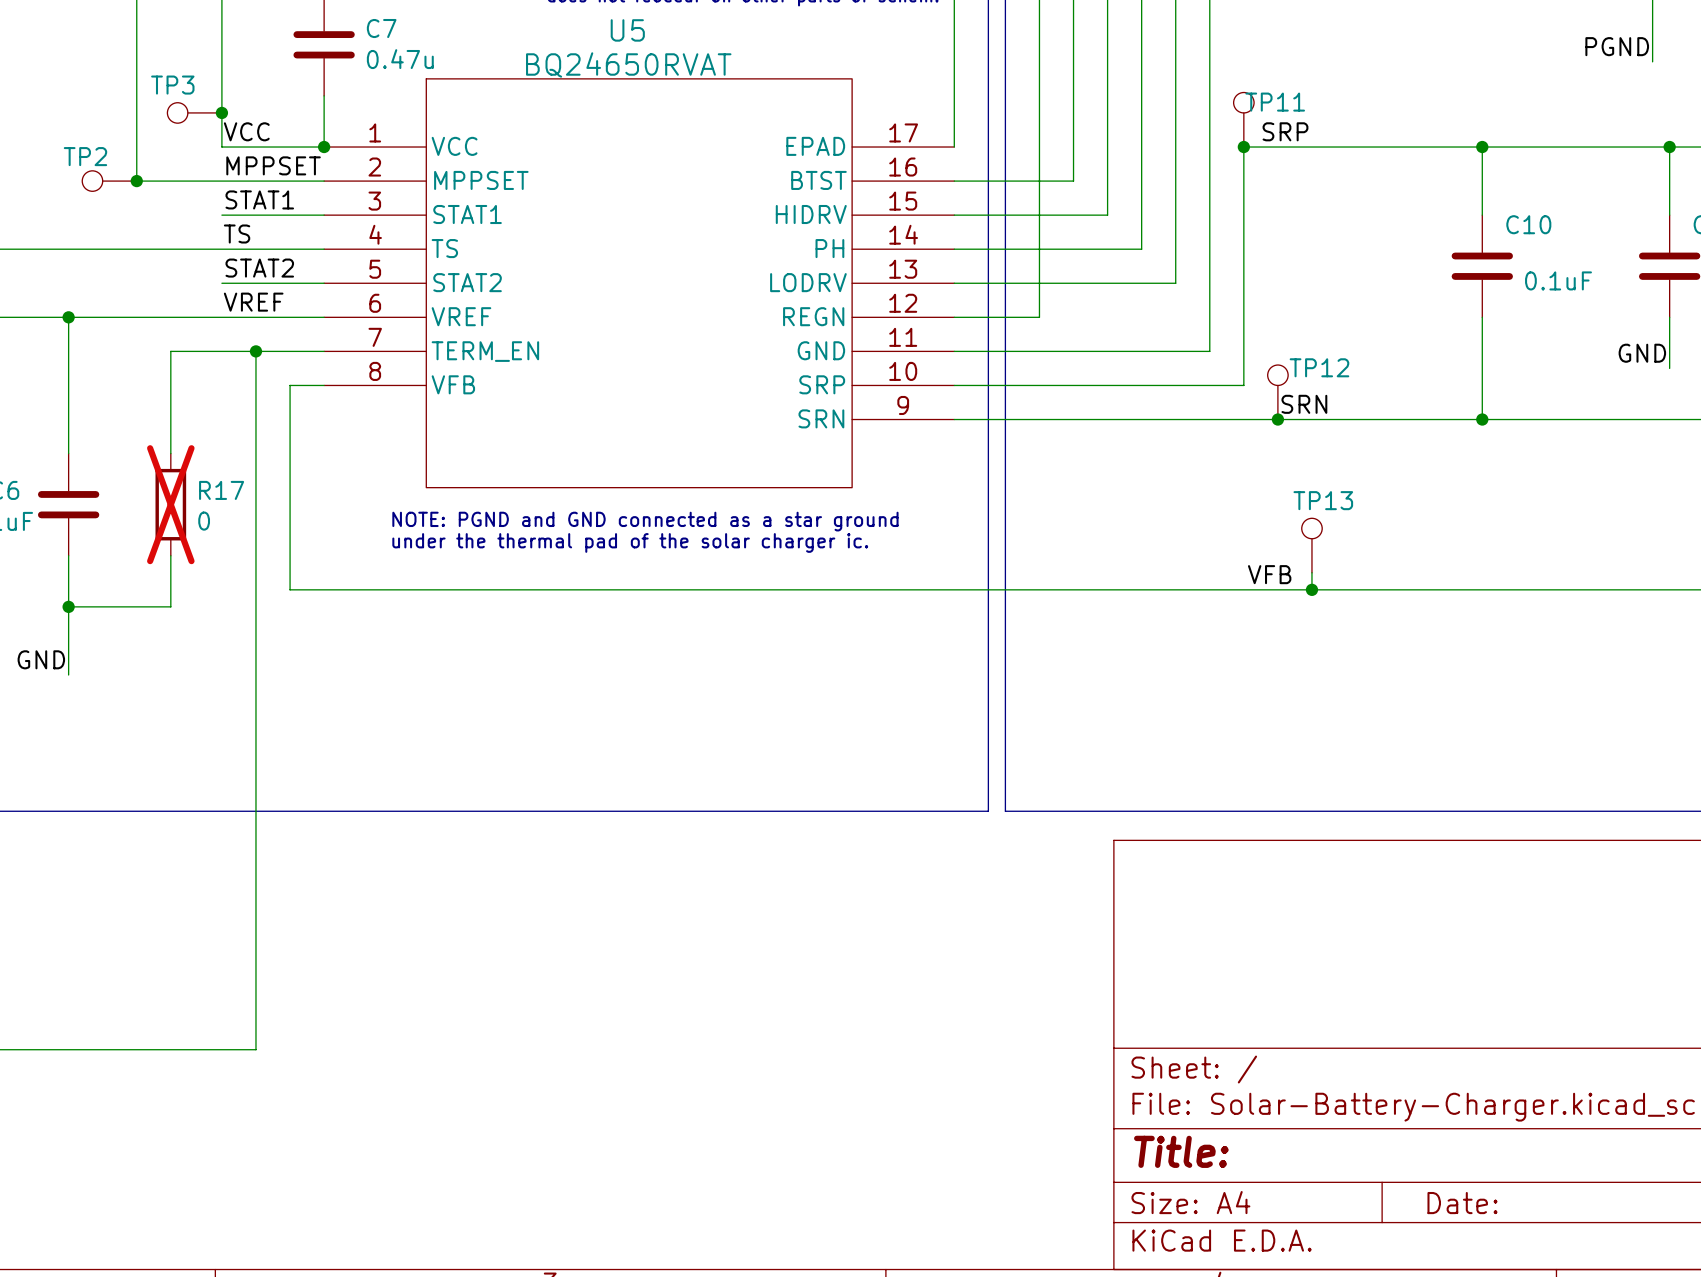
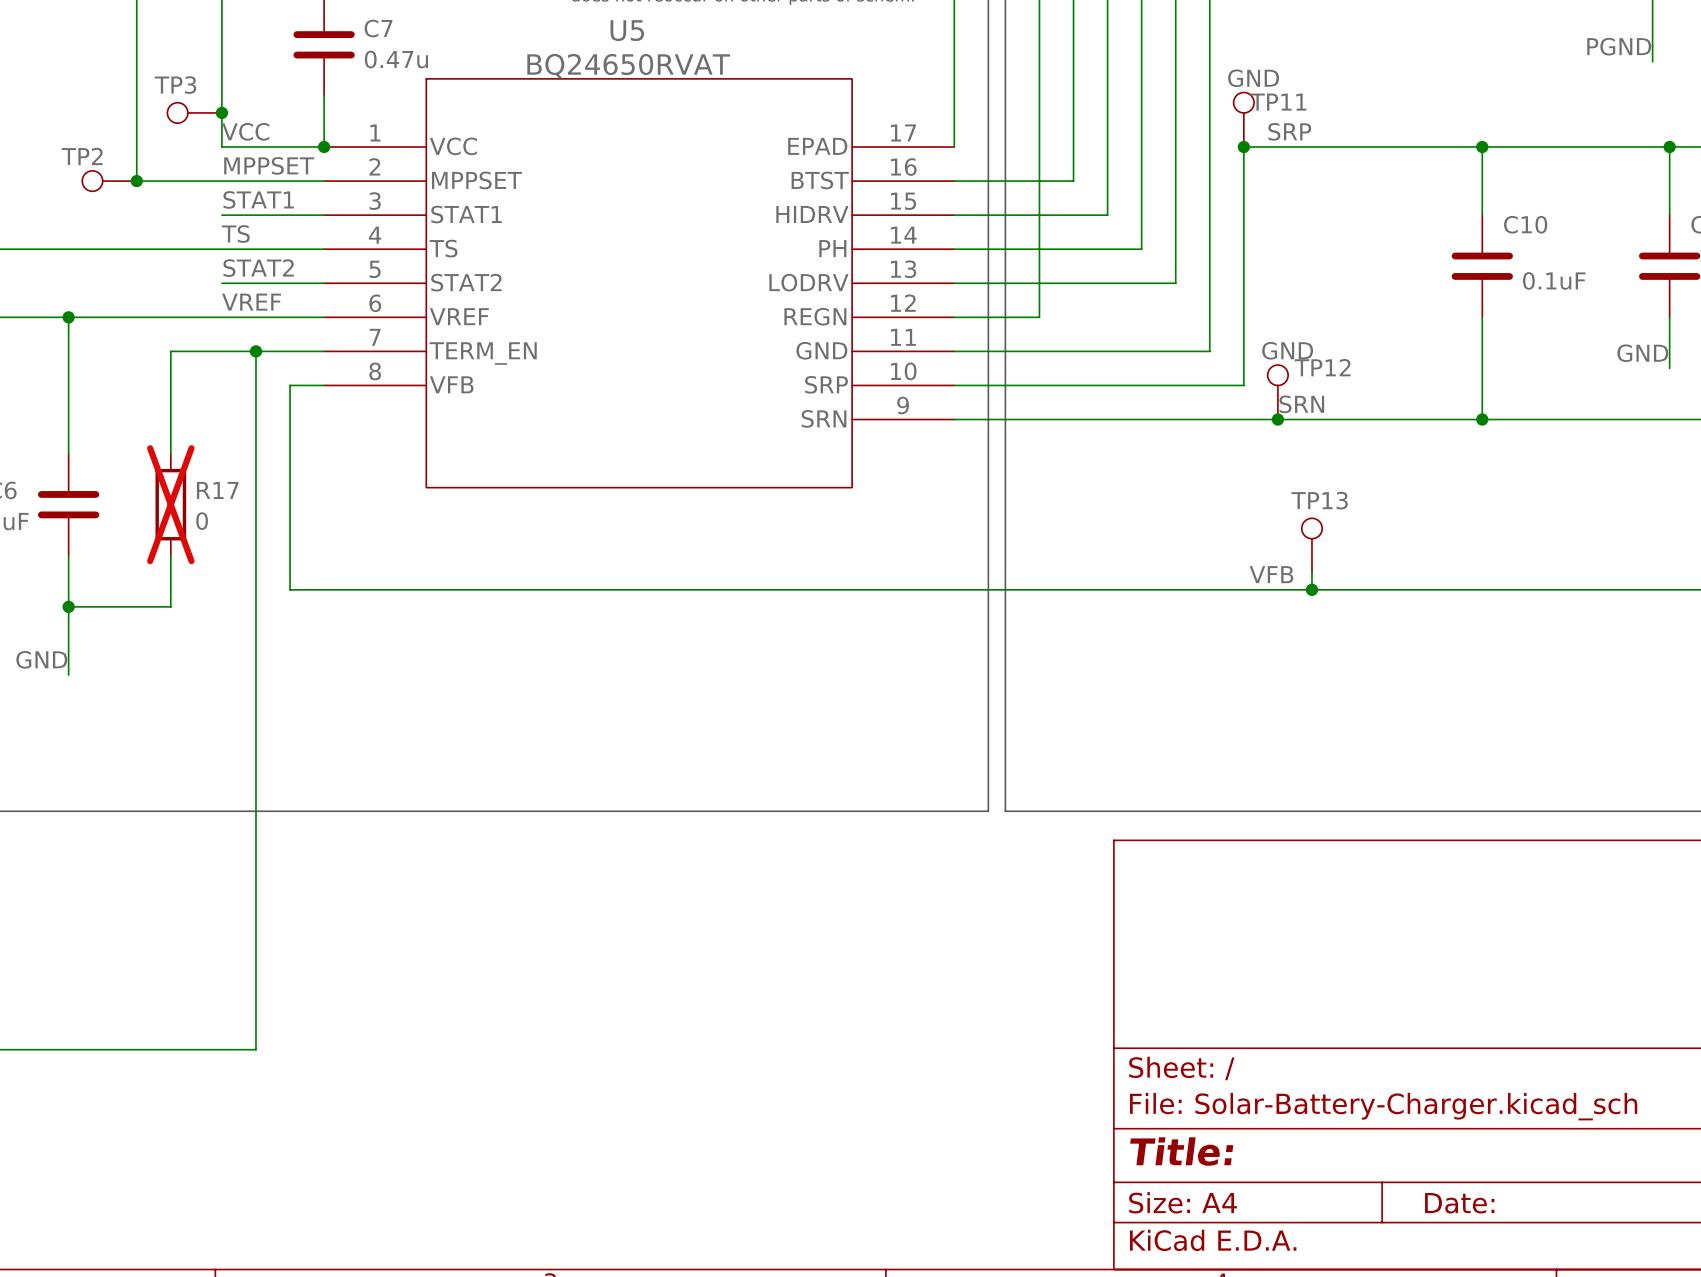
TP11 value: none -> GND (1253, 78)
TP12 value: none -> GND (1287, 350)
text: NOTE: PGND and GND connected as a star ground (645, 521) -> none
text: under the thermal pad of the solar charger ic. (630, 542) -> none

